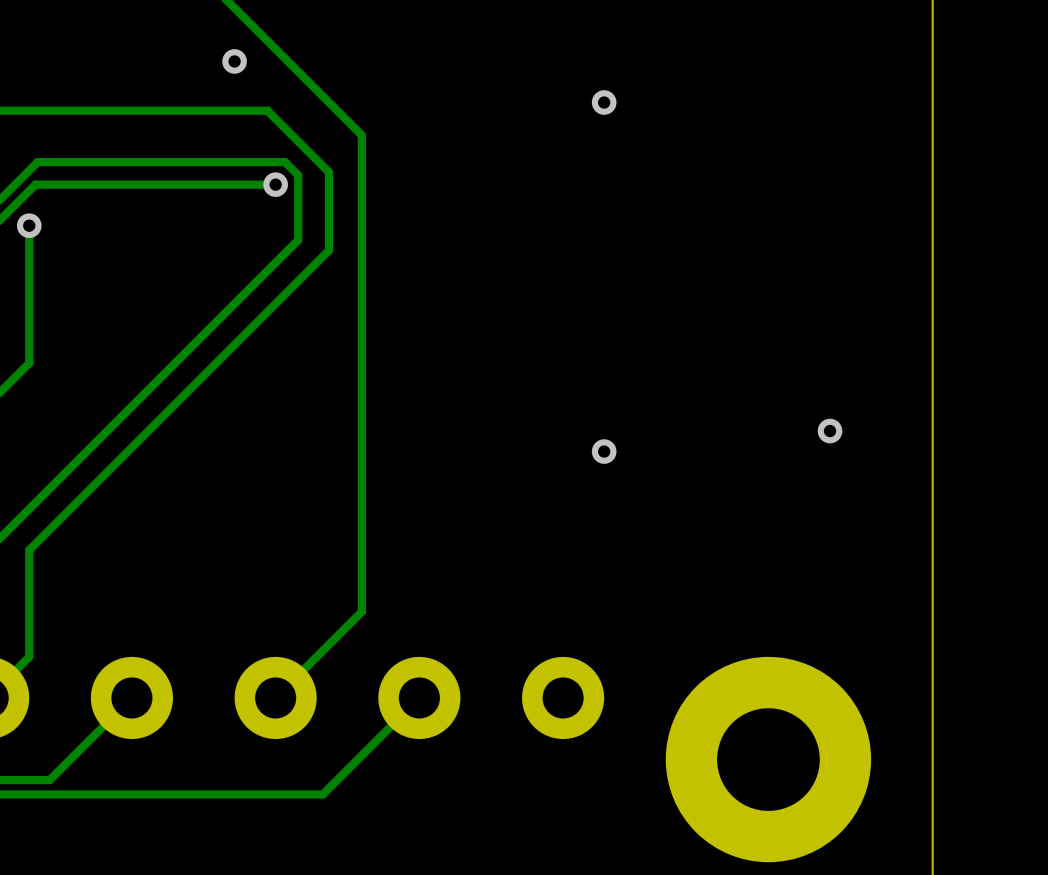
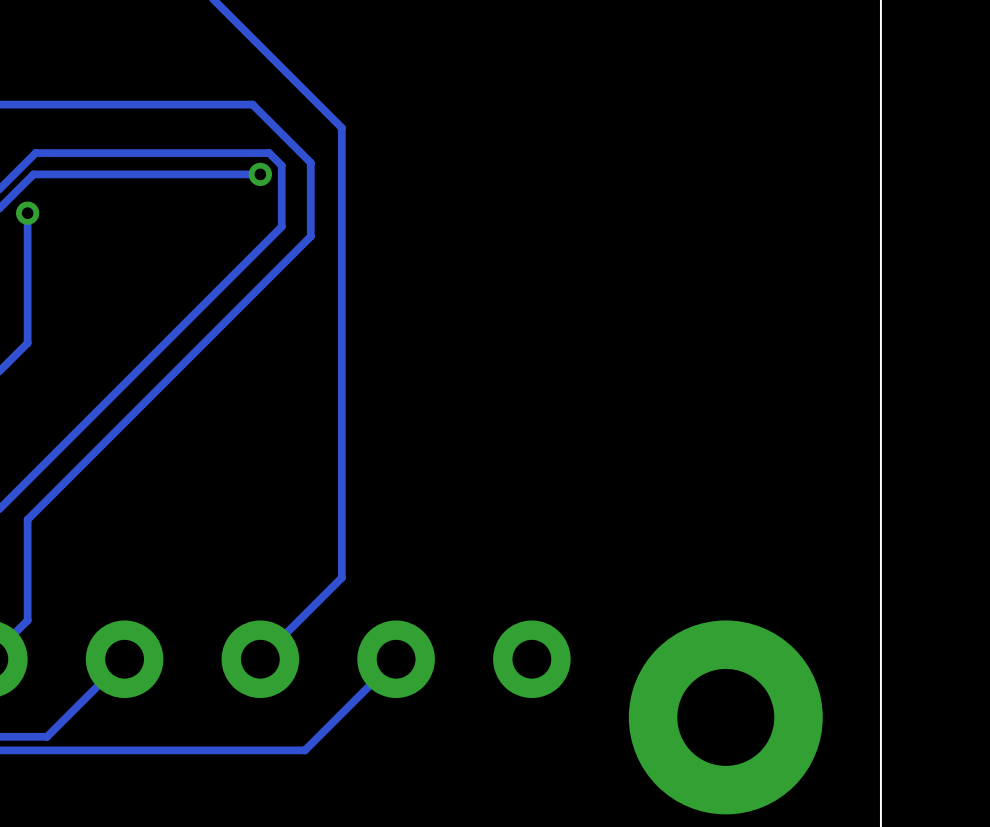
via: (234, 61) -> none
via: (604, 102) -> none
via: (830, 431) -> none
via: (604, 451) -> none

